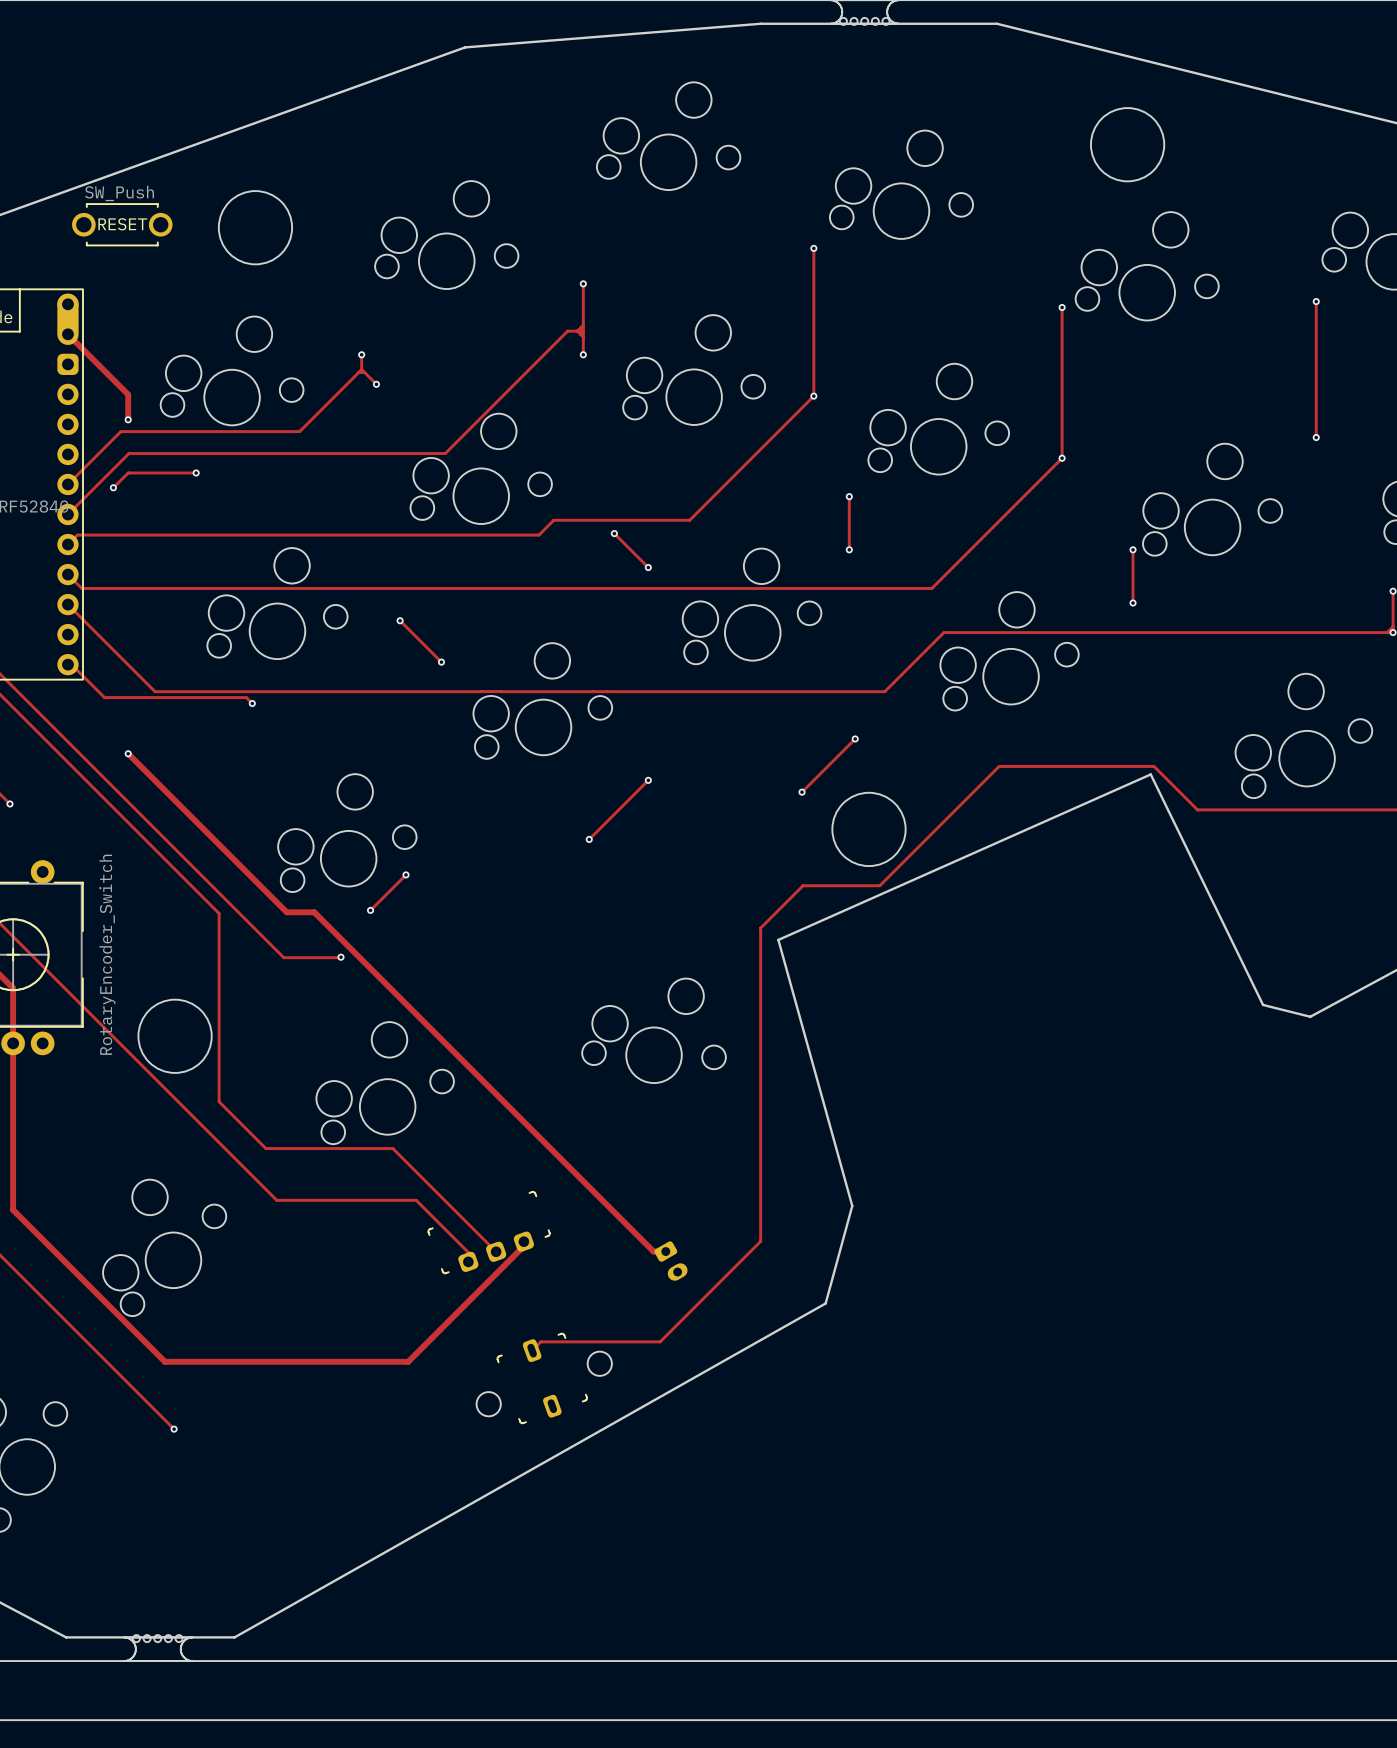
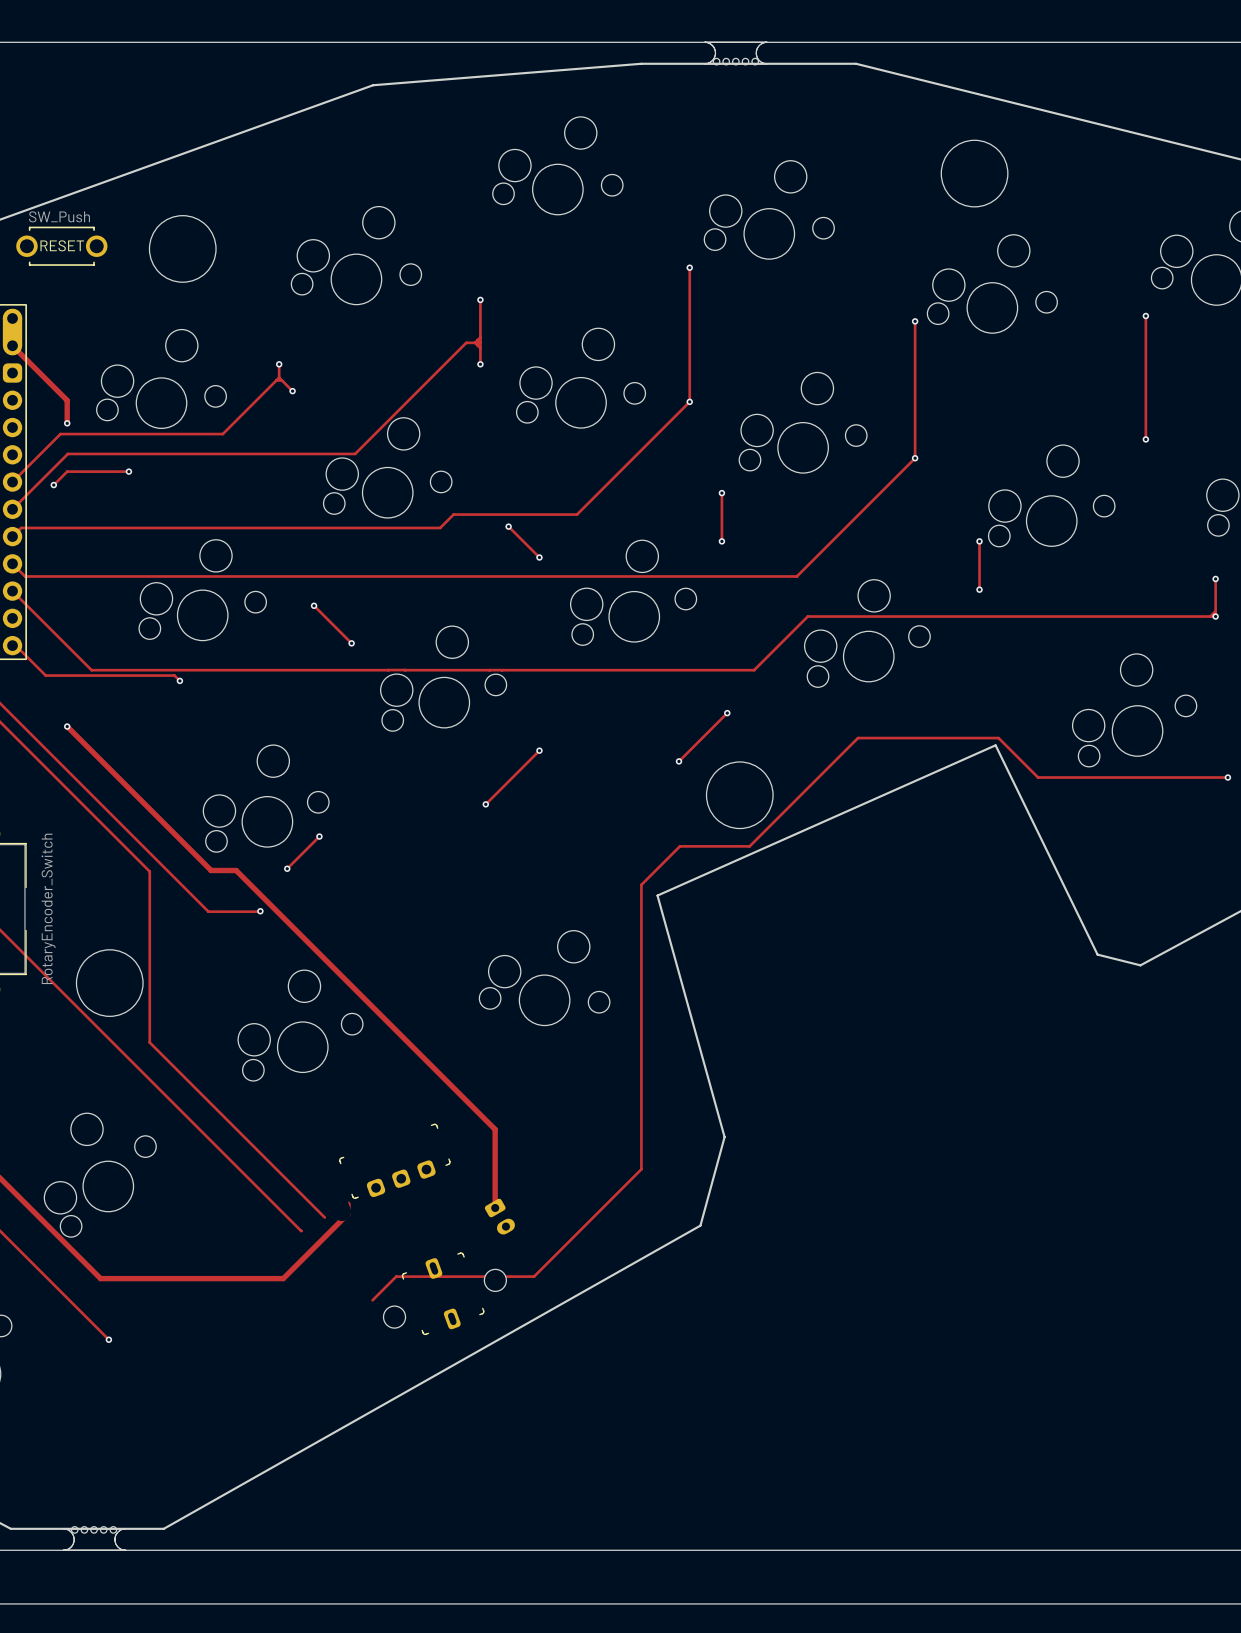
track: (265, 1148) (392, 1148) (496, 1251) -> (192, 1085) (324, 1217)
track: (599, 1197) (653, 1251) (665, 1251) -> (495, 1129) (495, 1210)
track: (276, 1200) (416, 1200) (468, 1252) (468, 1261) -> (202, 1132) (301, 1230)
track: (523, 1241) (523, 1246) (408, 1361) (366, 1361) -> (348, 1204) (348, 1213) (283, 1278)
part position: (670, 1261) -> (499, 1216)
track: (660, 1341) (540, 1341) (532, 1350) -> (550, 1260) (534, 1276) (396, 1276) (372, 1300)

